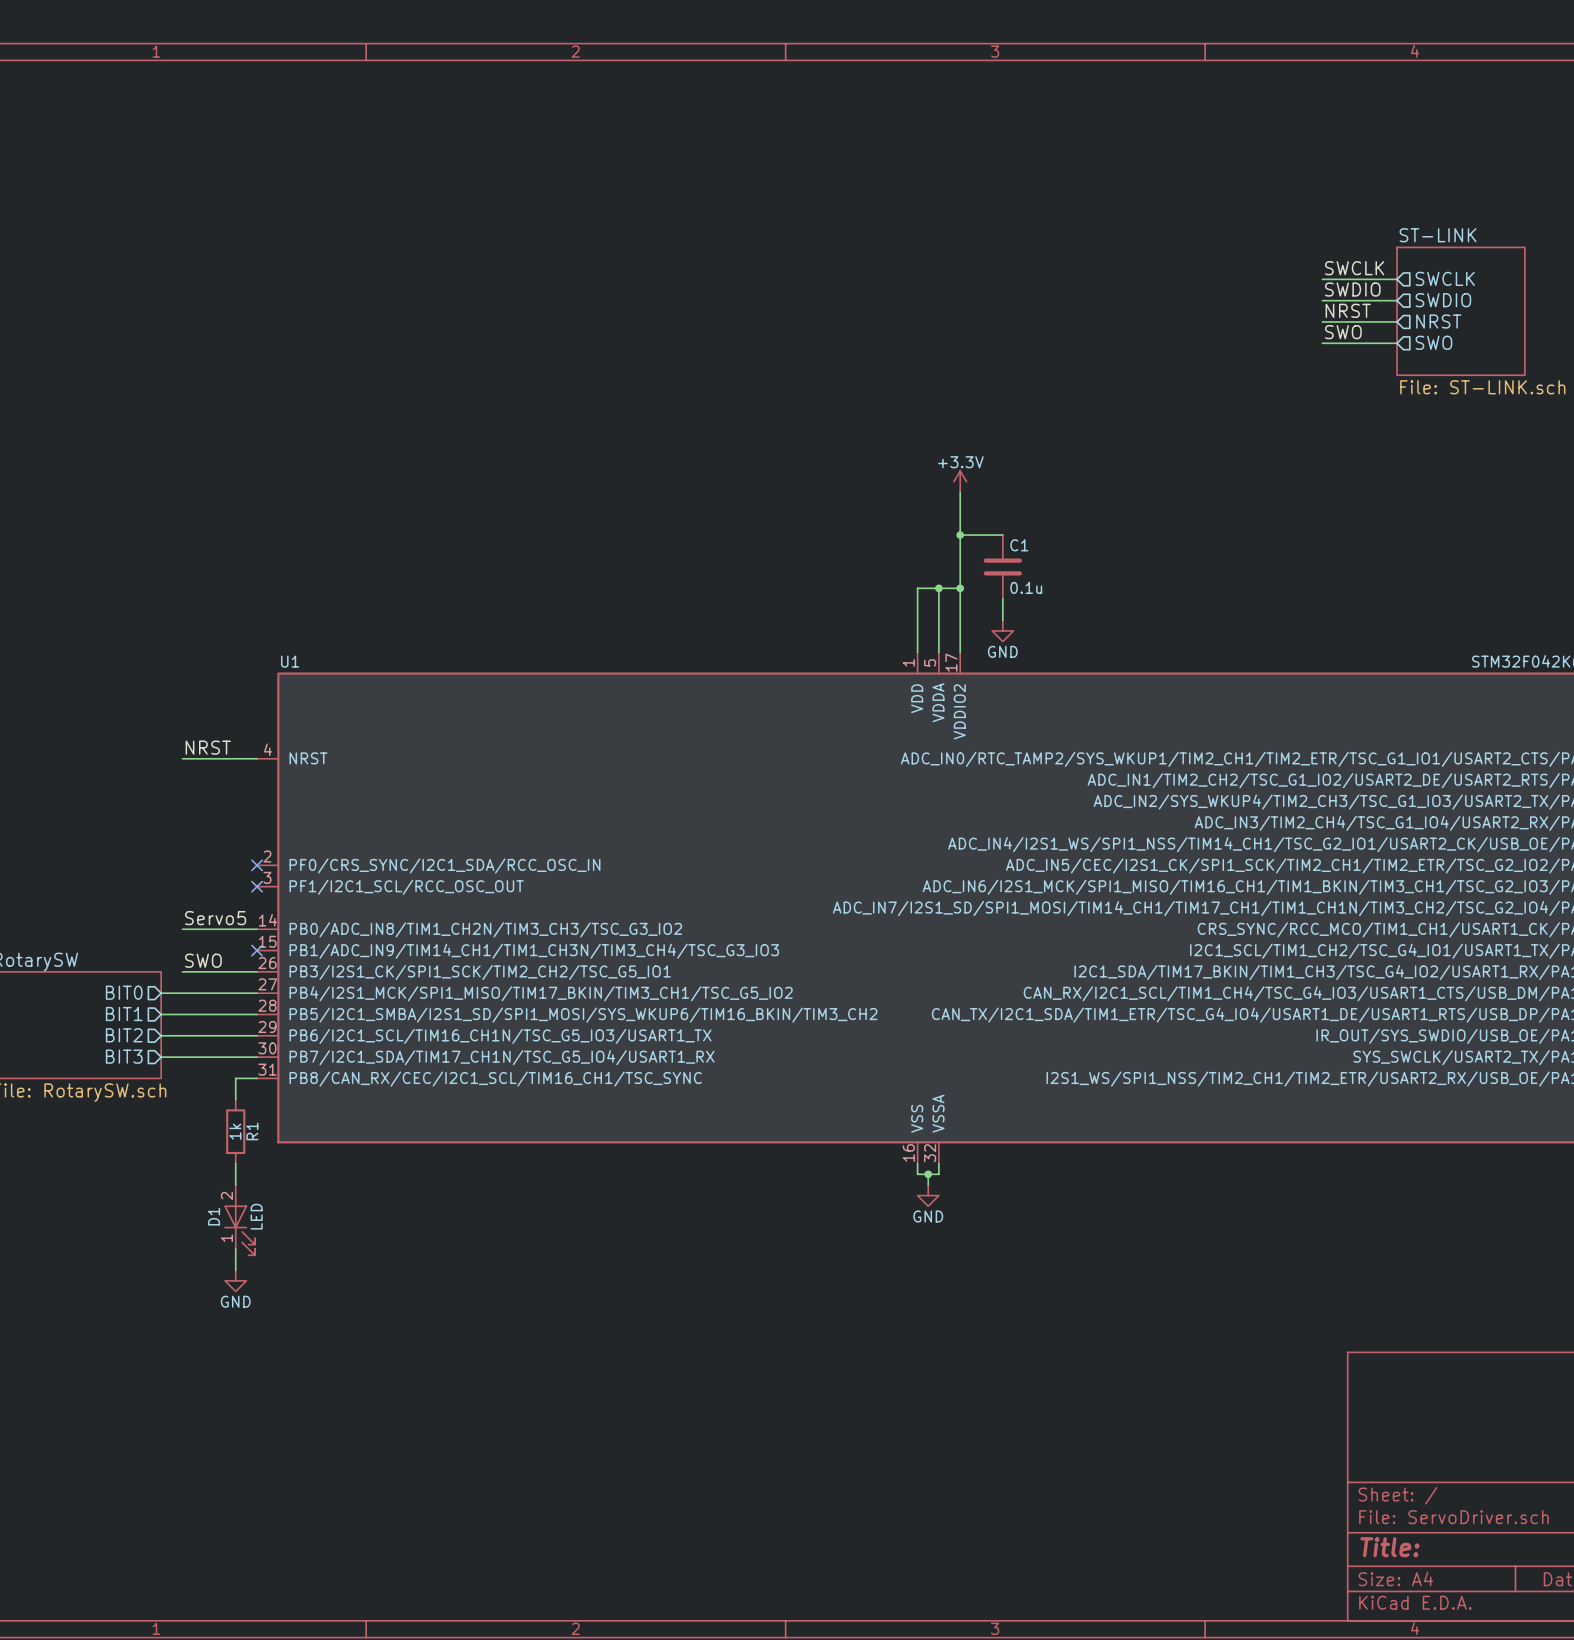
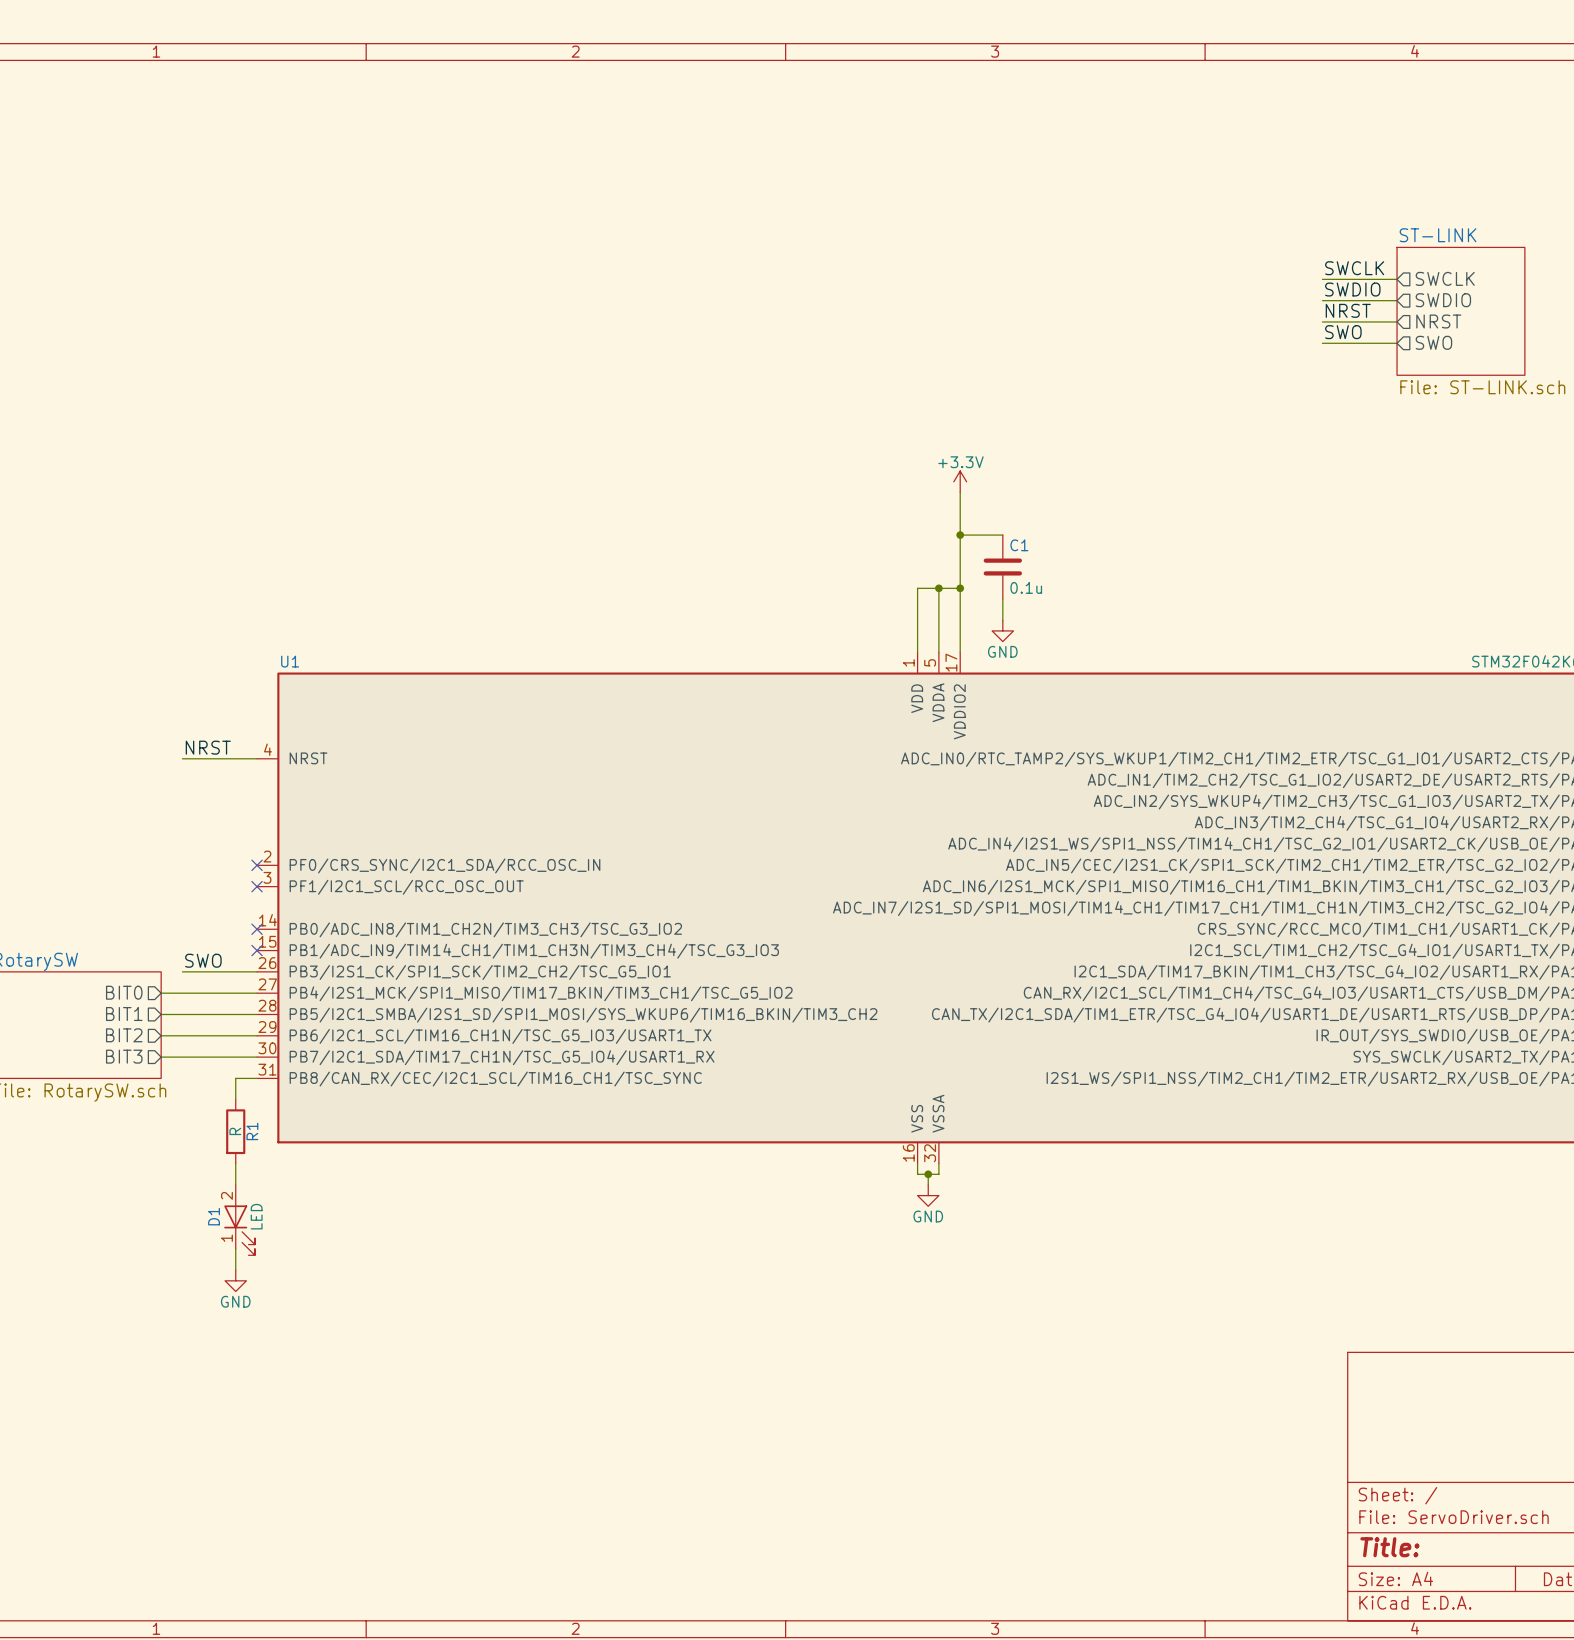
label: Servo5 (215, 918) -> none
wire: (182, 929) (257, 929) -> none
no-connect mark: none -> (257, 929)
R1 value: 1k (235, 1131) -> R (235, 1131)

